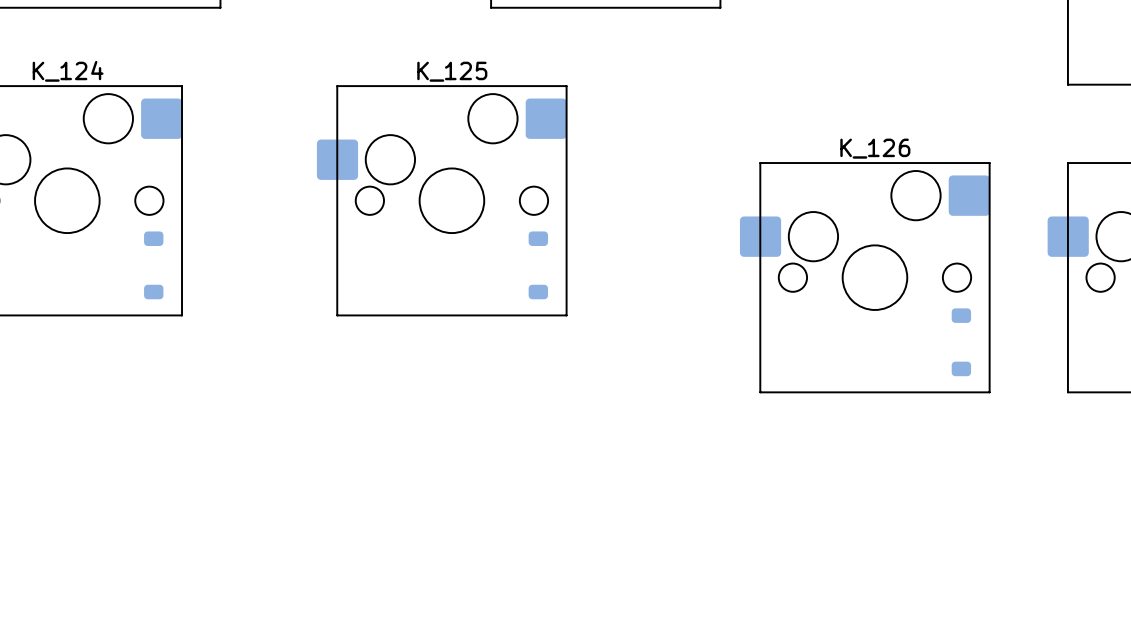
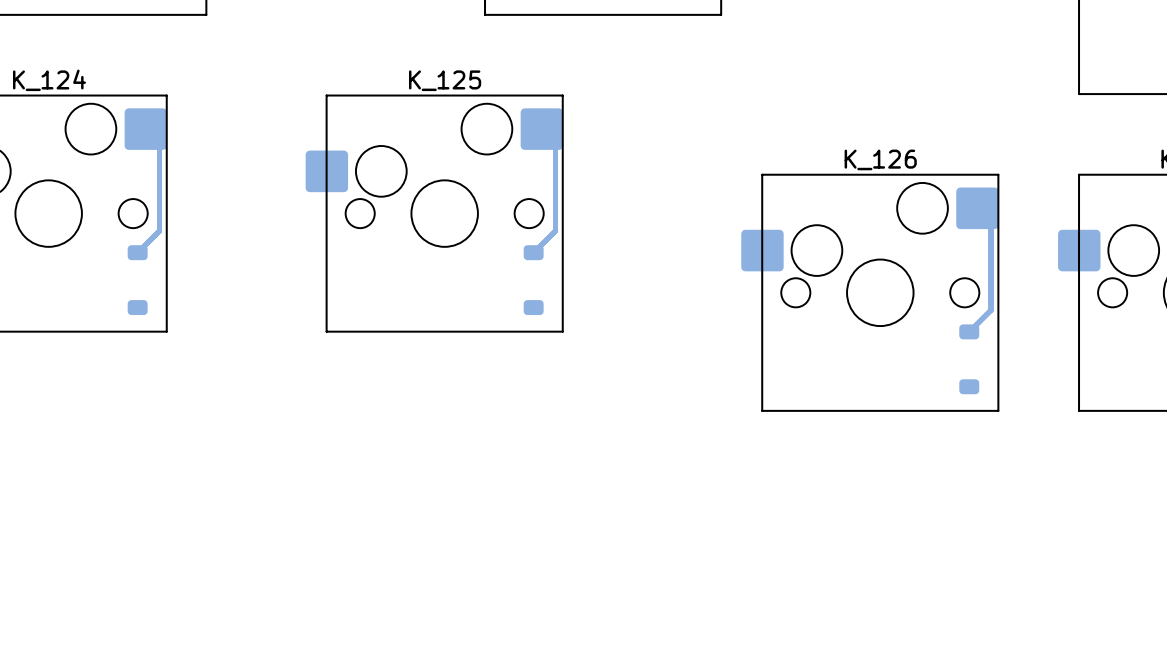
bottom track: none -> (160, 143) (145, 129) (159, 142) (159, 230) (137, 252)
bottom track: none -> (556, 143) (541, 129) (555, 142) (555, 230) (533, 252)
bottom track: none -> (991, 222) (977, 208) (991, 221) (991, 310) (969, 331)

